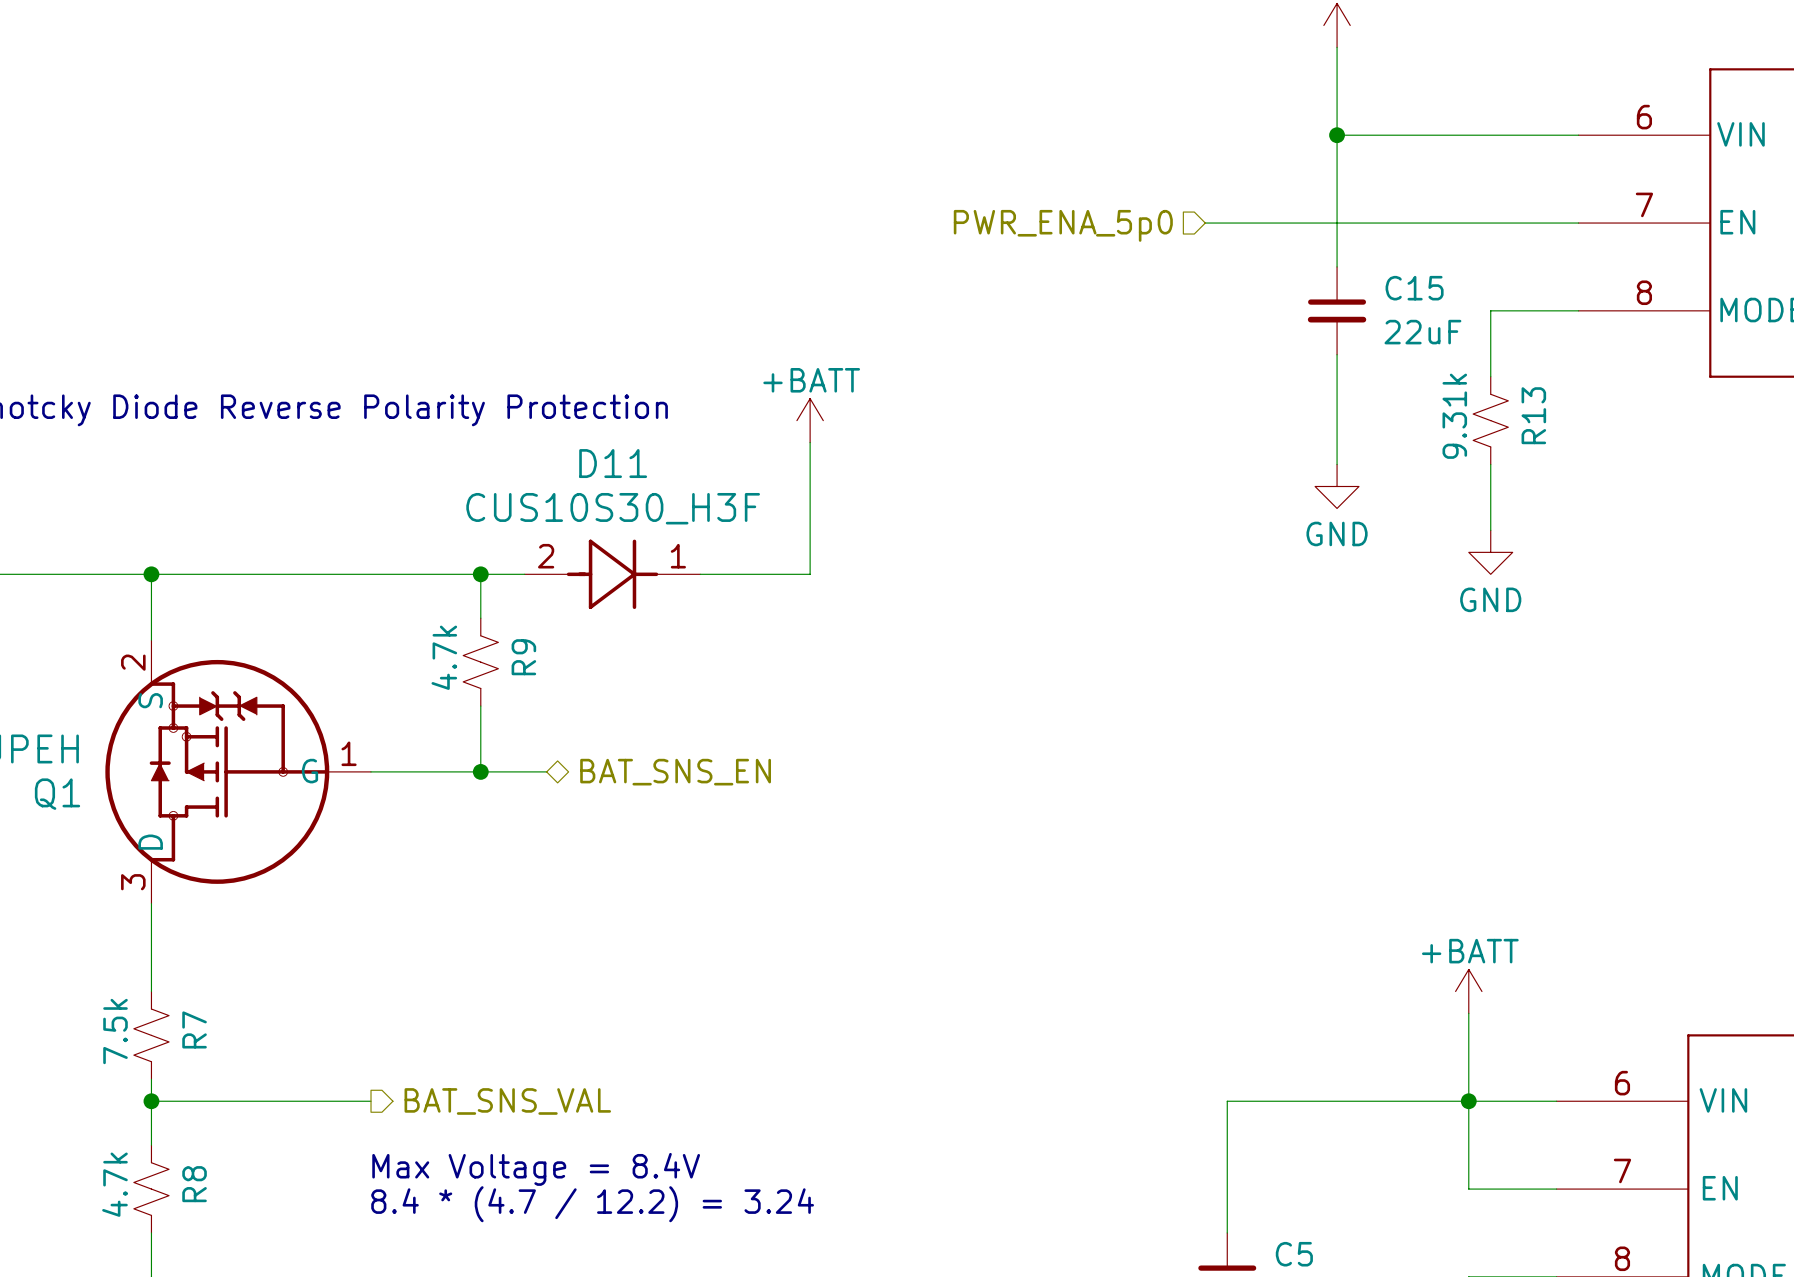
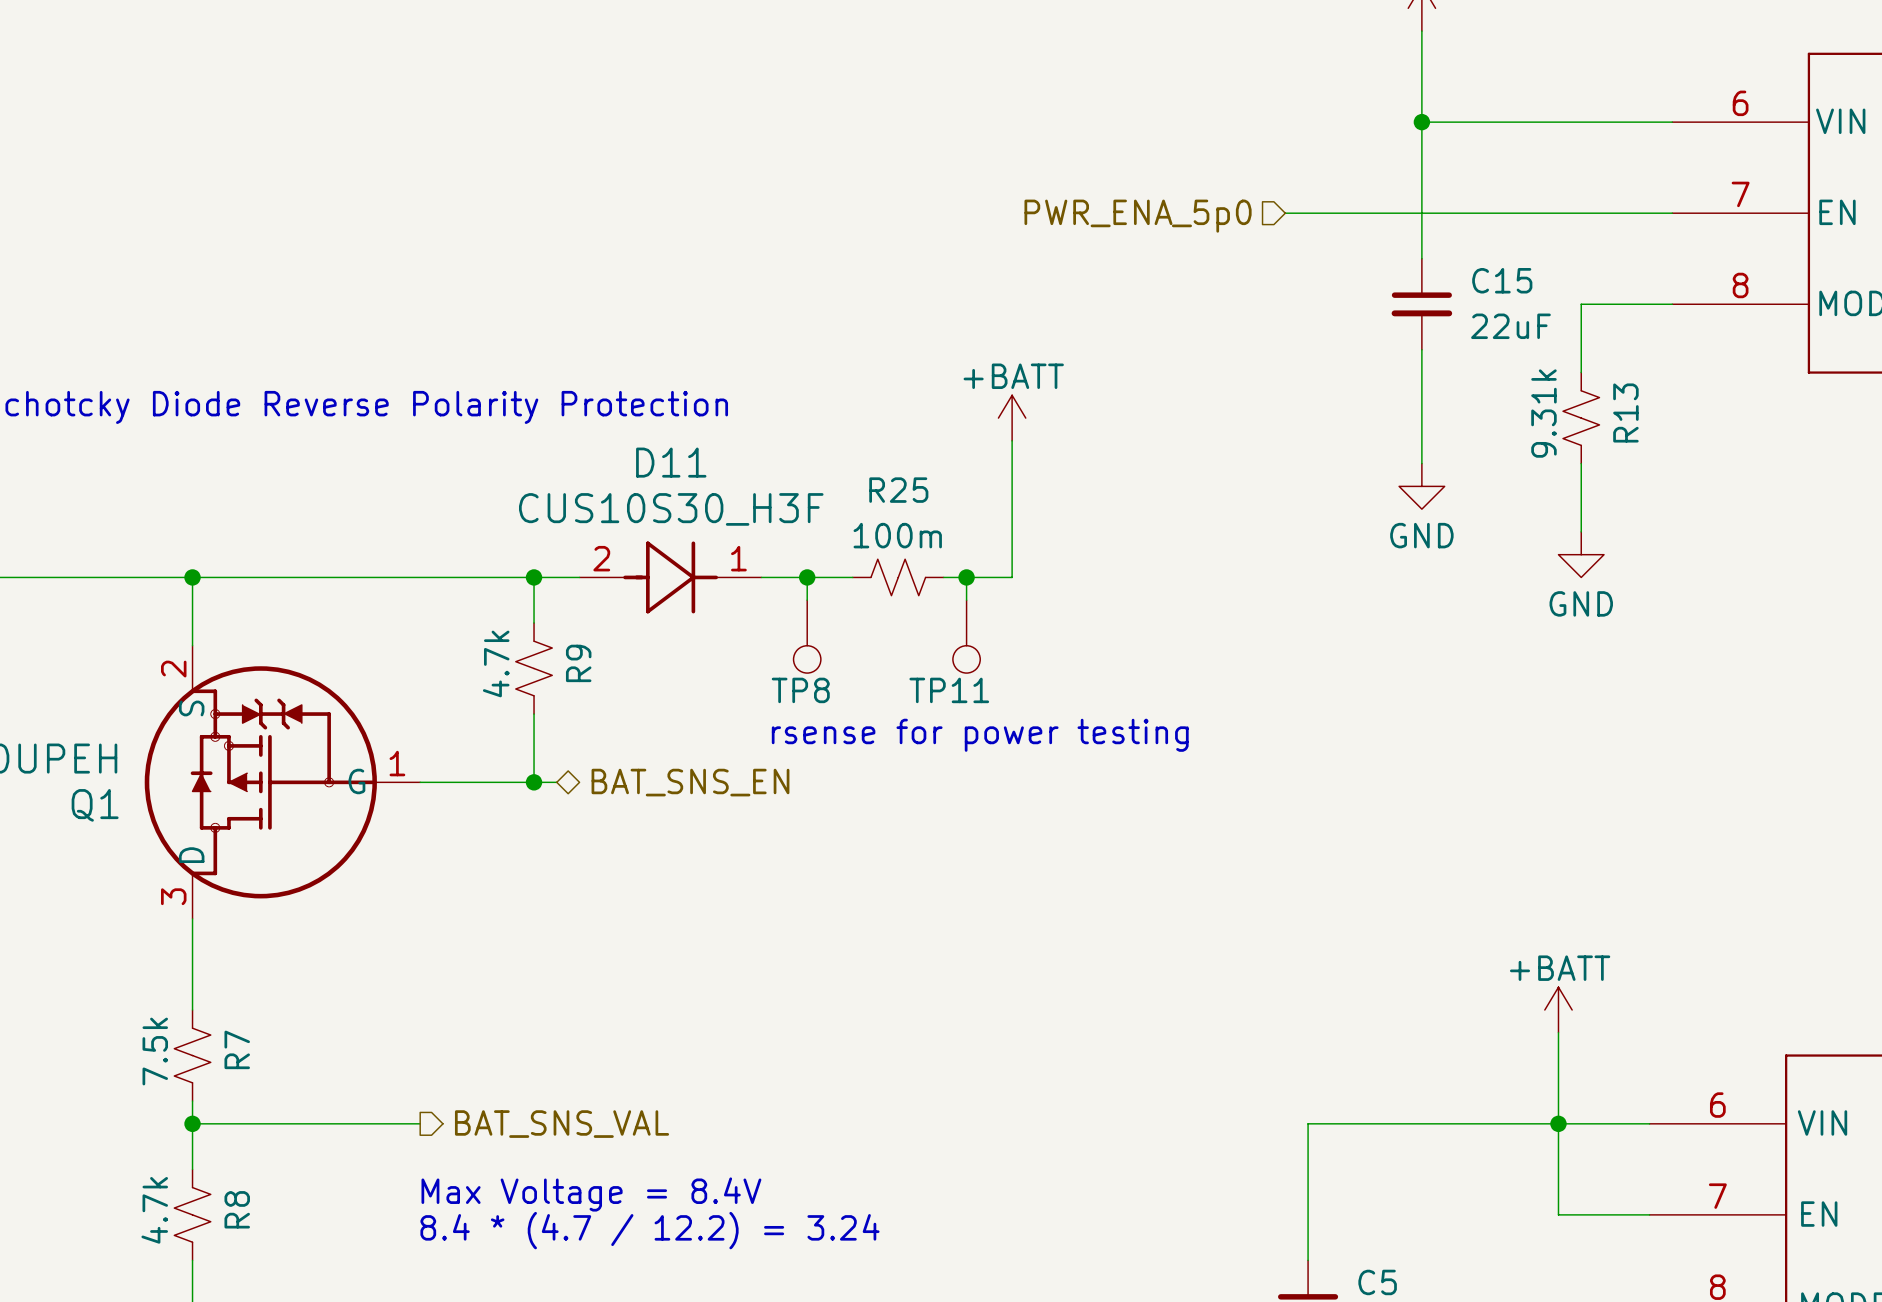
power symbol position: +BATT (810, 420) -> +BATT (1012, 418)
wire: (810, 442) (810, 574) (788, 574) -> none
wire: none -> (1012, 440) (1012, 577) (943, 577)
wire: none -> (807, 577) (807, 600)
junction: none -> (807, 577)
R25: none -> 100m (898, 577)
wire: none -> (966, 577) (966, 600)
junction: none -> (966, 577)
TP8: none -> (807, 636)
TP11: none -> (966, 636)
text: none -> rsense for power testing (980, 735)
wire: (502, 771) (546, 771) -> none
hierarchical label position: BAT_SNS_EN (675, 772) -> BAT_SNS_EN (690, 782)

